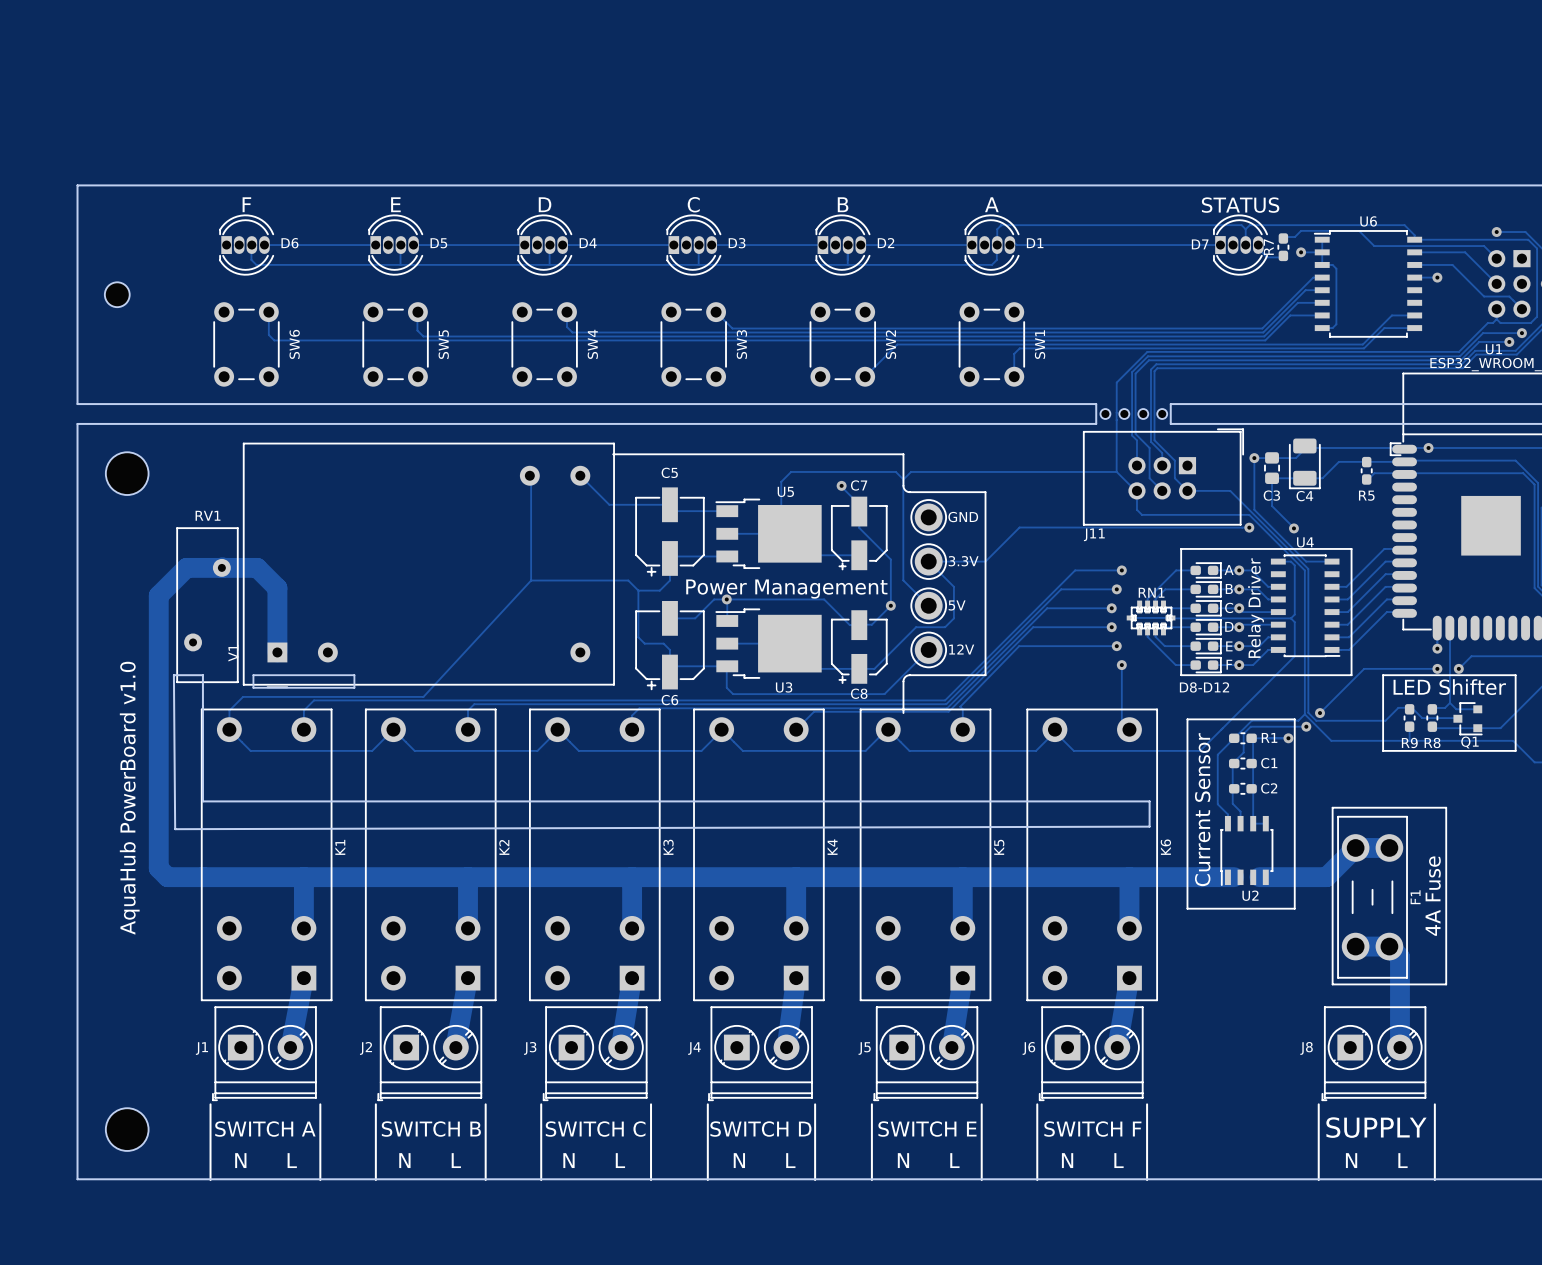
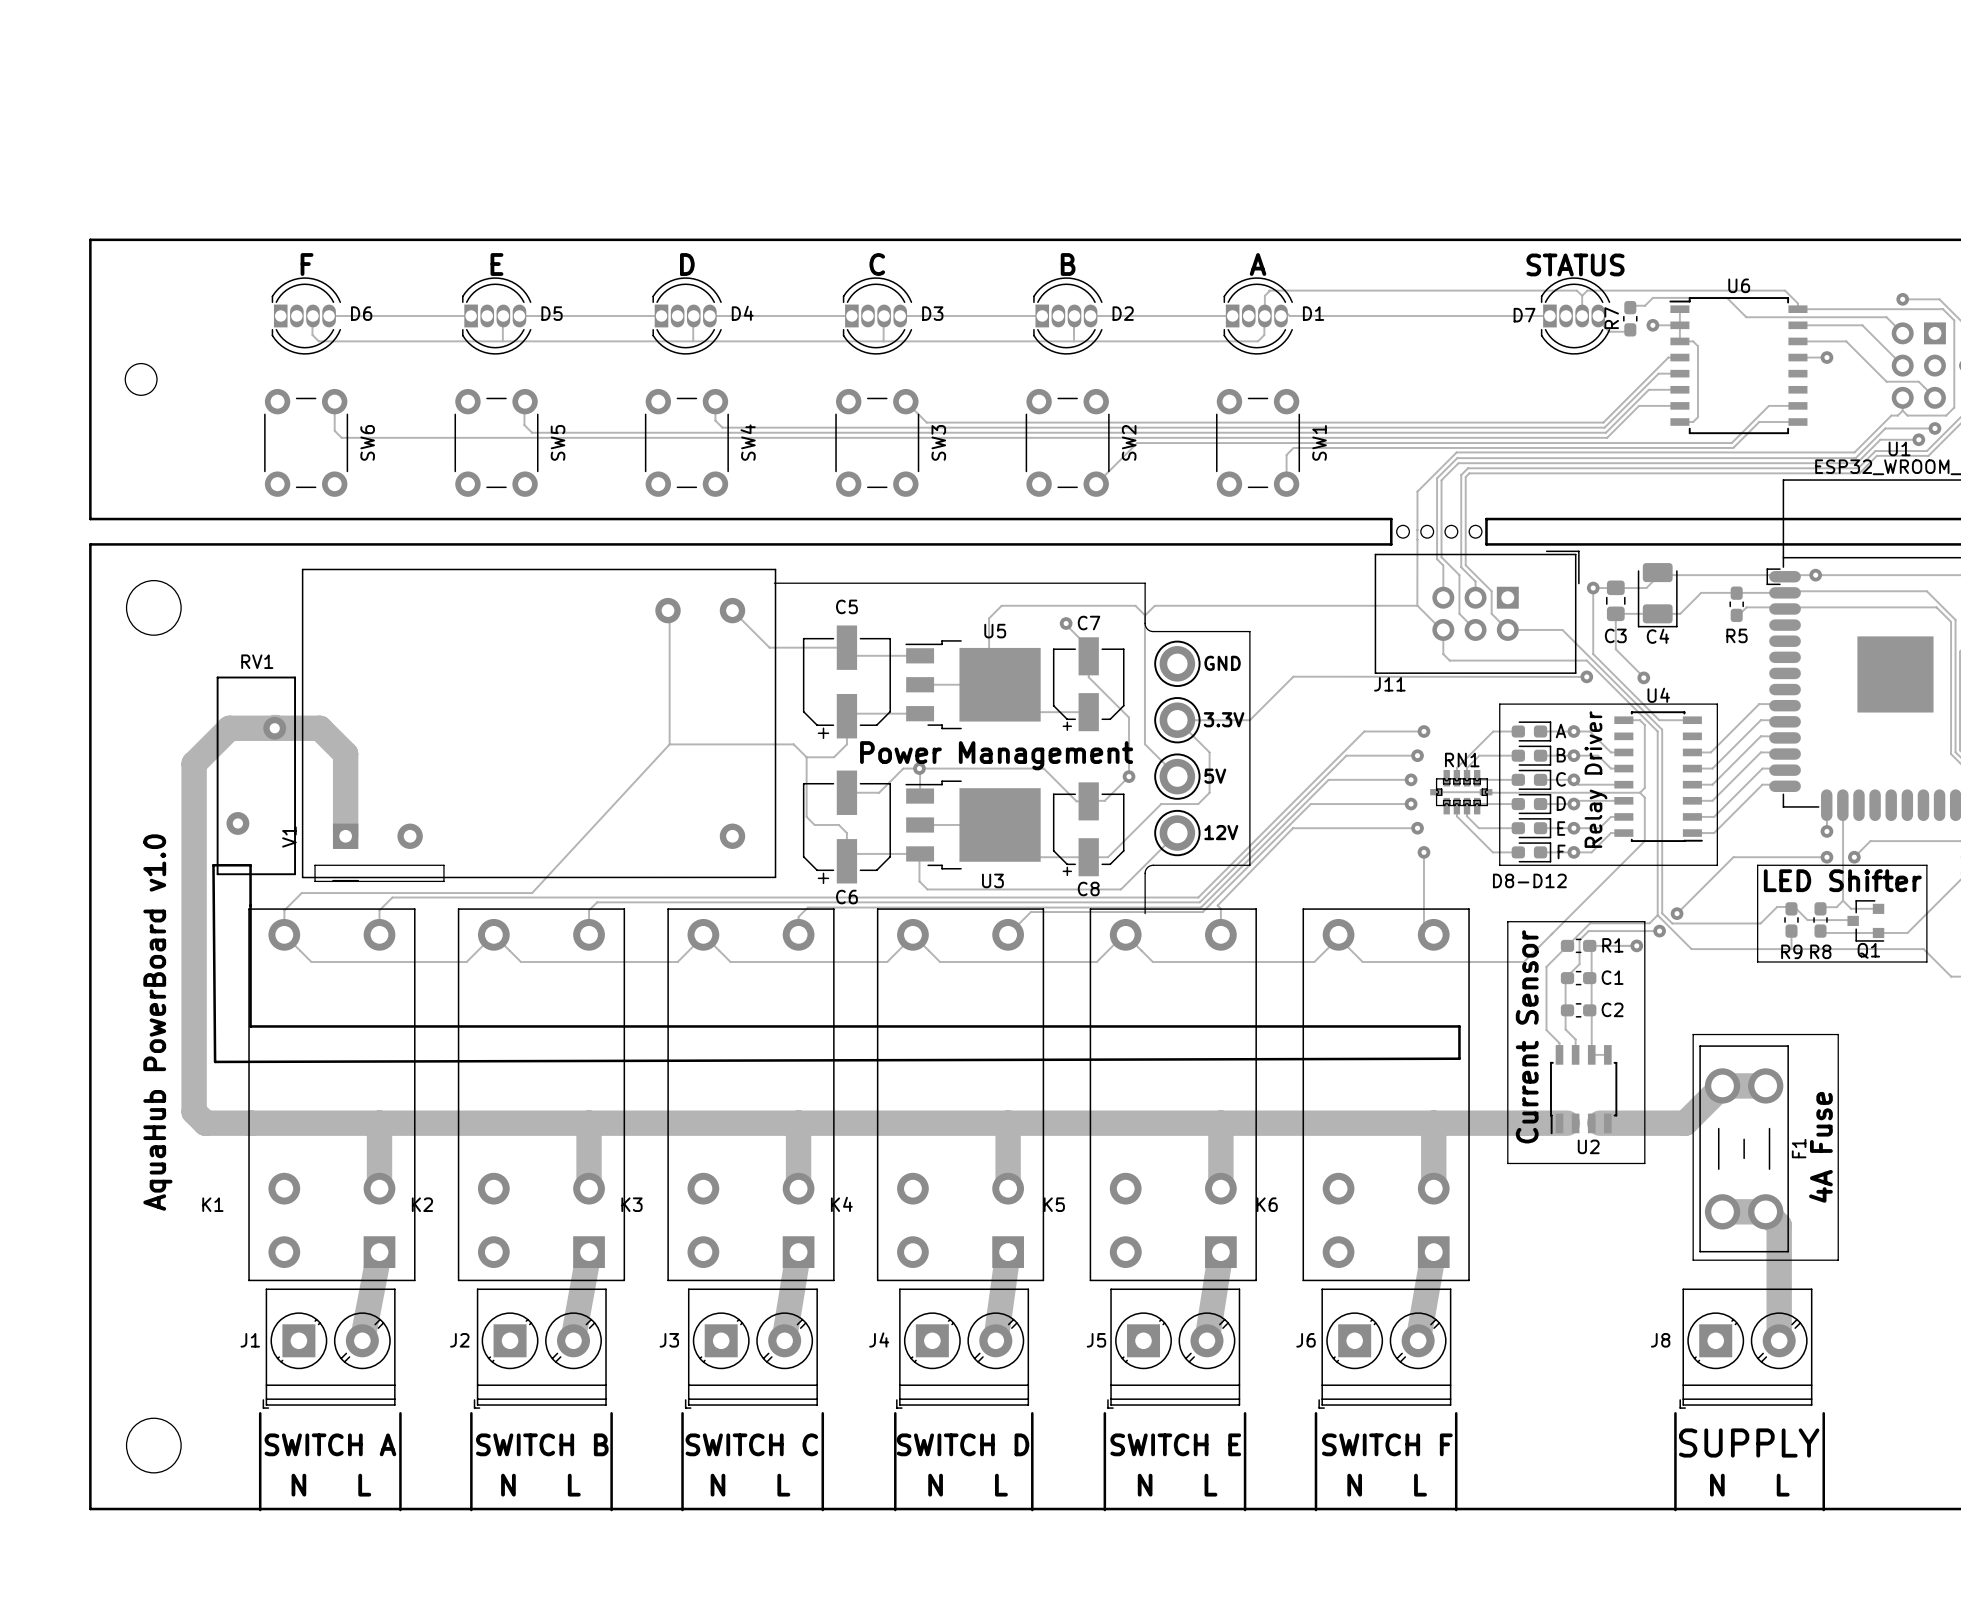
K1 name rotation: 0° (340, 847) -> 90° clockwise (212, 1204)
K1 name position: K1 (340, 847) -> K1 (212, 1204)
K2 name rotation: 0° (504, 847) -> 90° clockwise (422, 1204)
K2 name position: K2 (504, 847) -> K2 (422, 1204)
K3 name rotation: 0° (668, 847) -> 90° clockwise (631, 1204)
K3 name position: K3 (668, 847) -> K3 (631, 1204)
K4 name rotation: 0° (832, 847) -> 90° clockwise (841, 1204)
K4 name position: K4 (832, 847) -> K4 (841, 1204)
K5 name rotation: 0° (999, 847) -> 90° clockwise (1054, 1204)
K5 name position: K5 (999, 847) -> K5 (1054, 1204)
K6 name rotation: 0° (1165, 847) -> 90° clockwise (1267, 1204)
K6 name position: K6 (1165, 847) -> K6 (1267, 1204)

